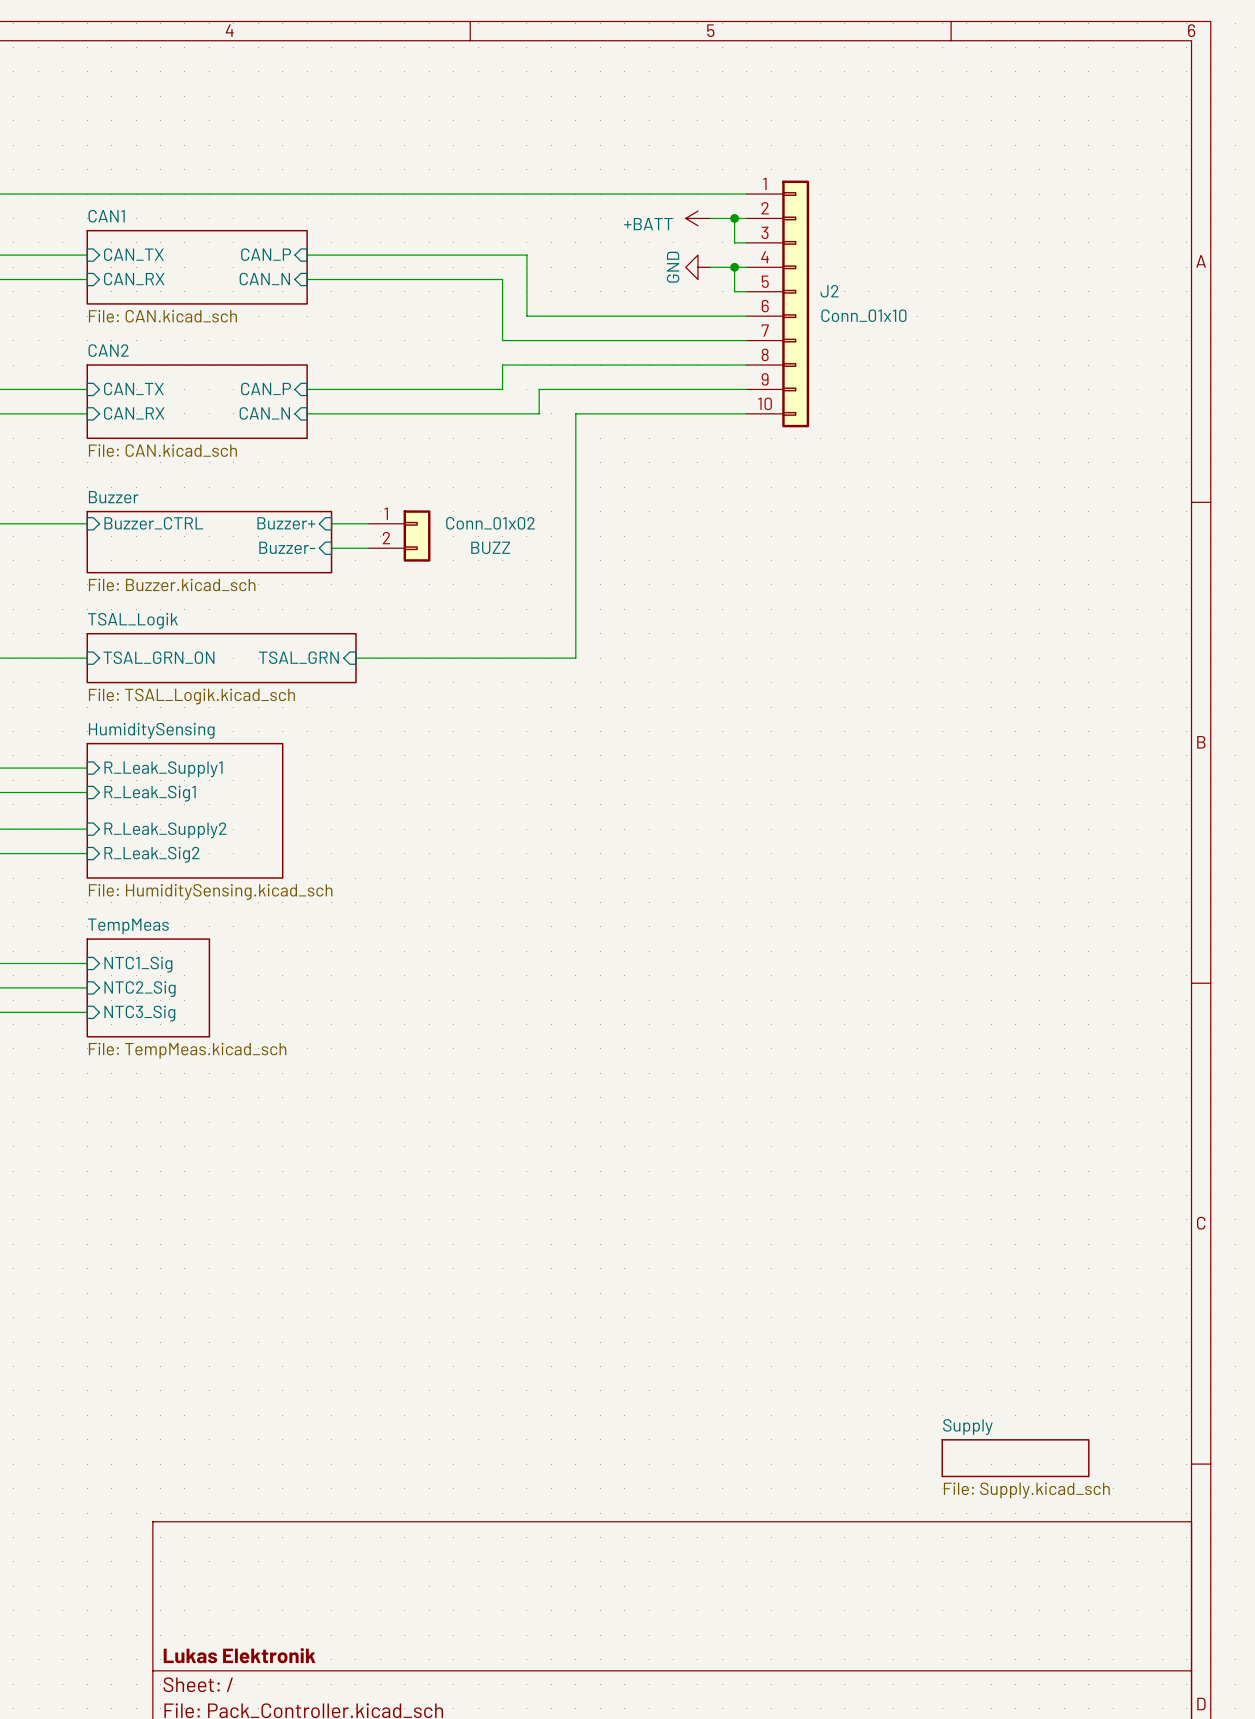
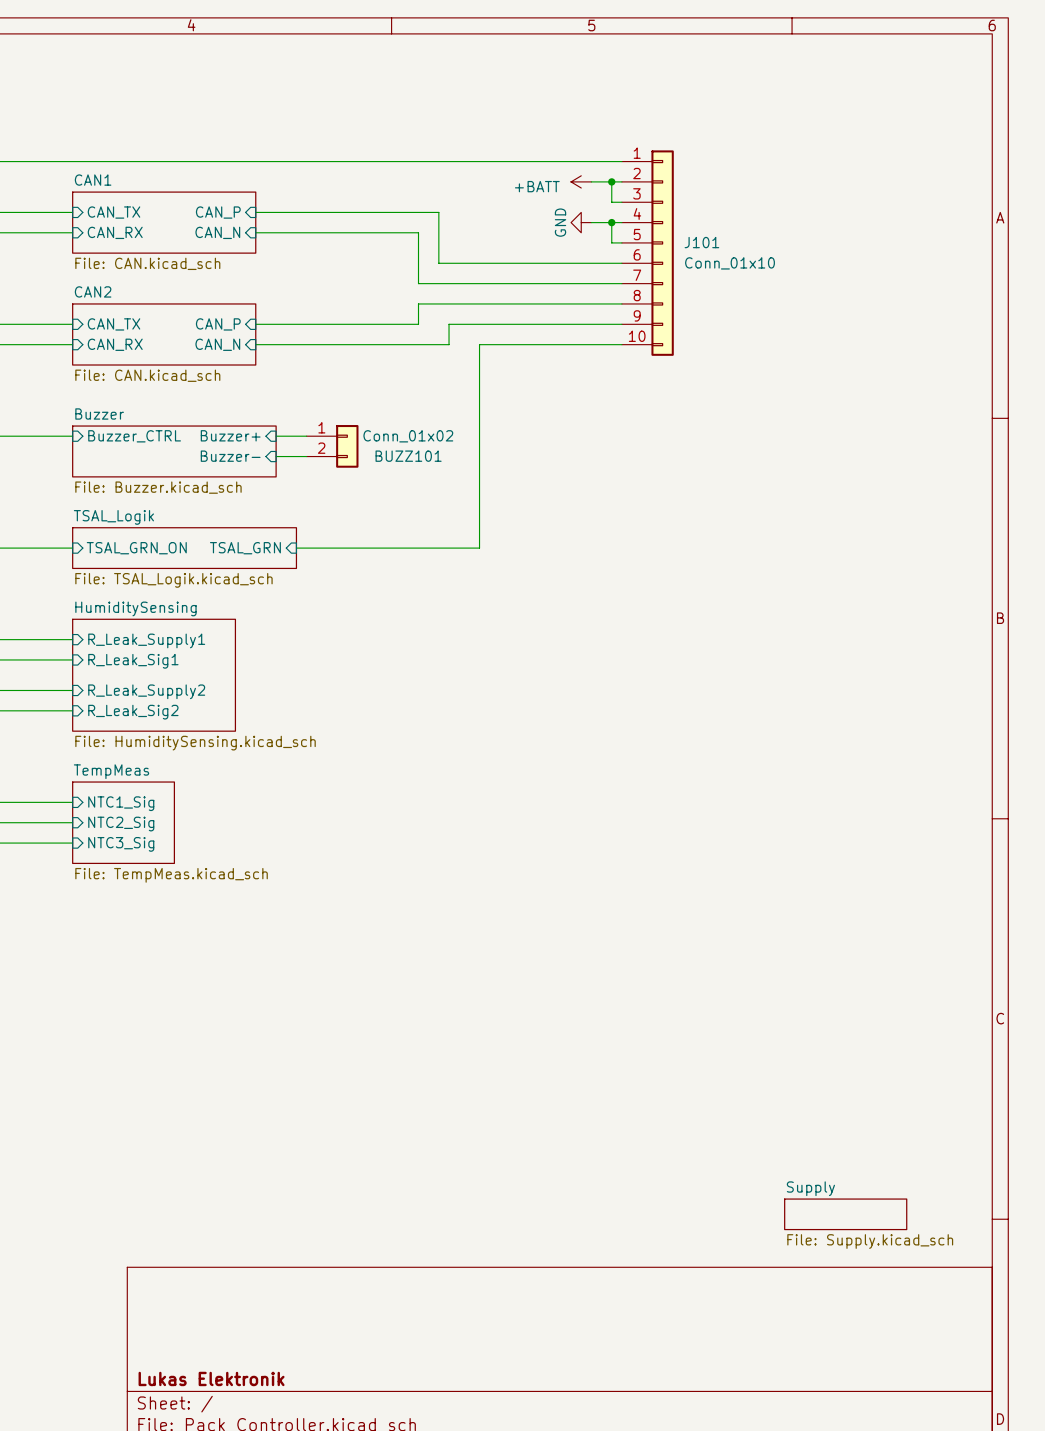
J2 name: J2 (829, 291) -> J101 (701, 242)
BUZZ name: BUZZ (490, 547) -> BUZZ101 (408, 456)

